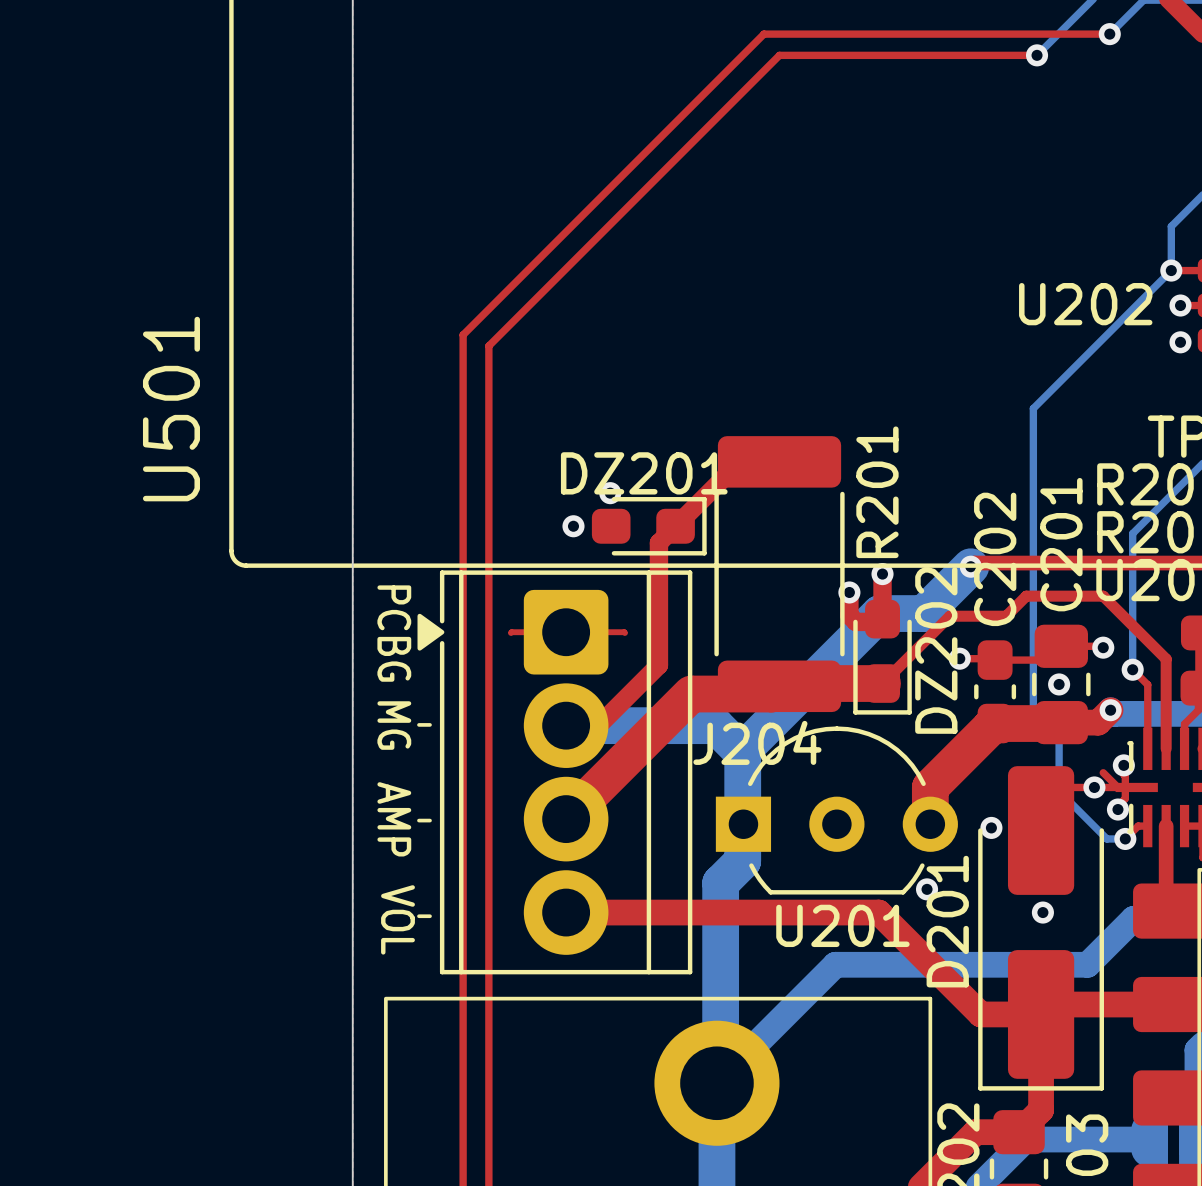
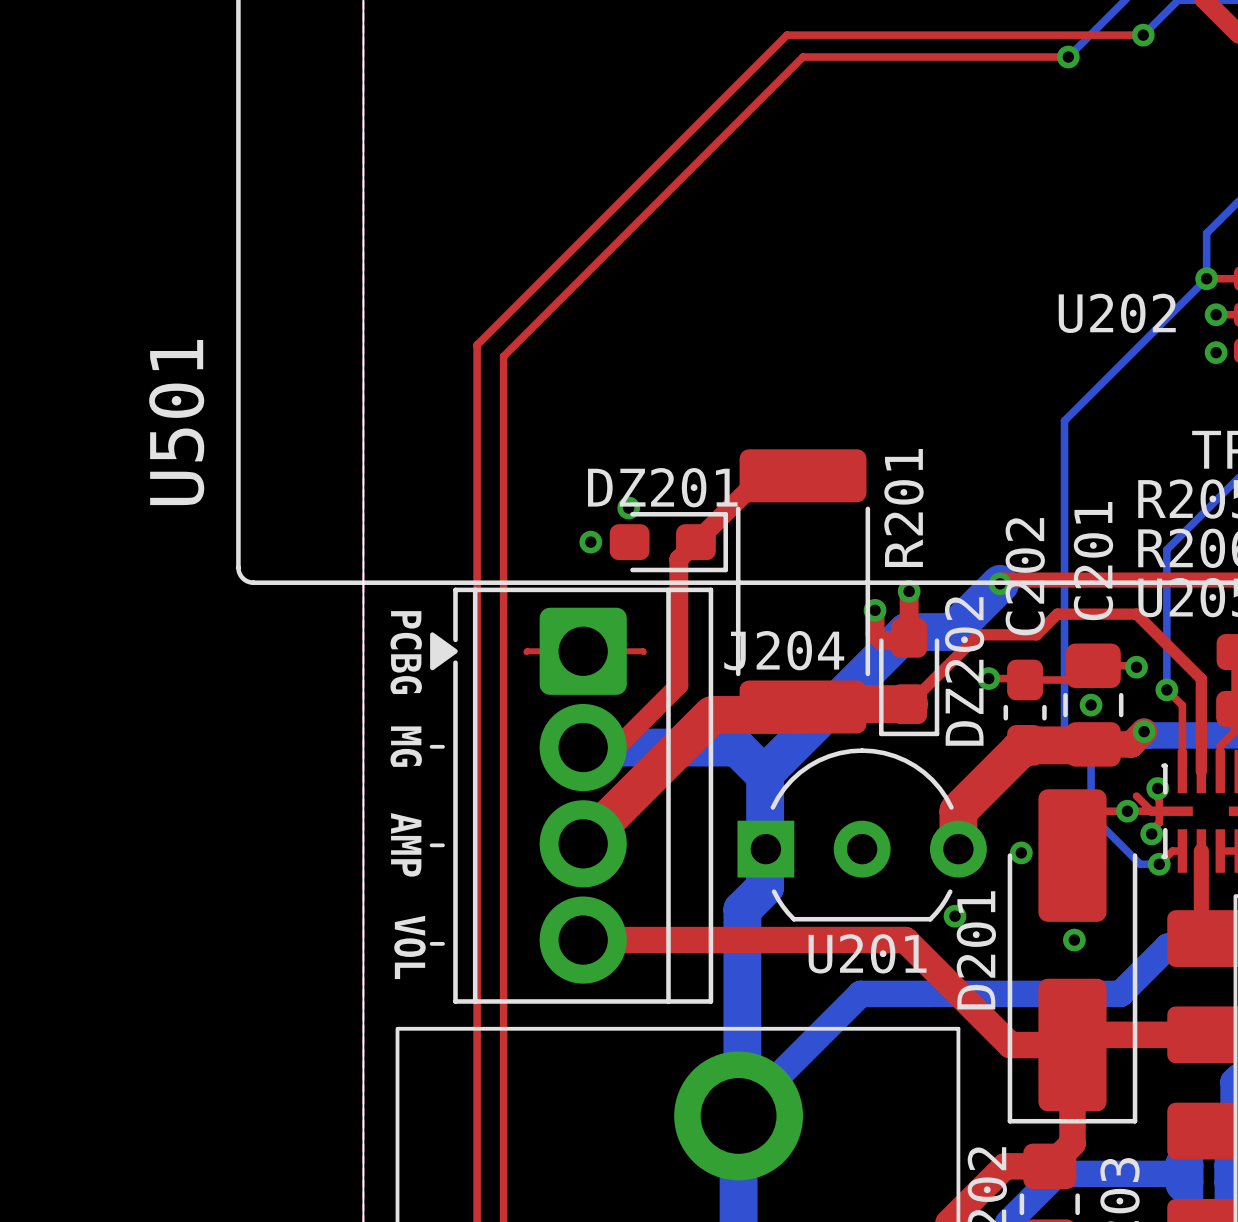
J204 name position: J204 (757, 742) -> J204 (784, 650)

